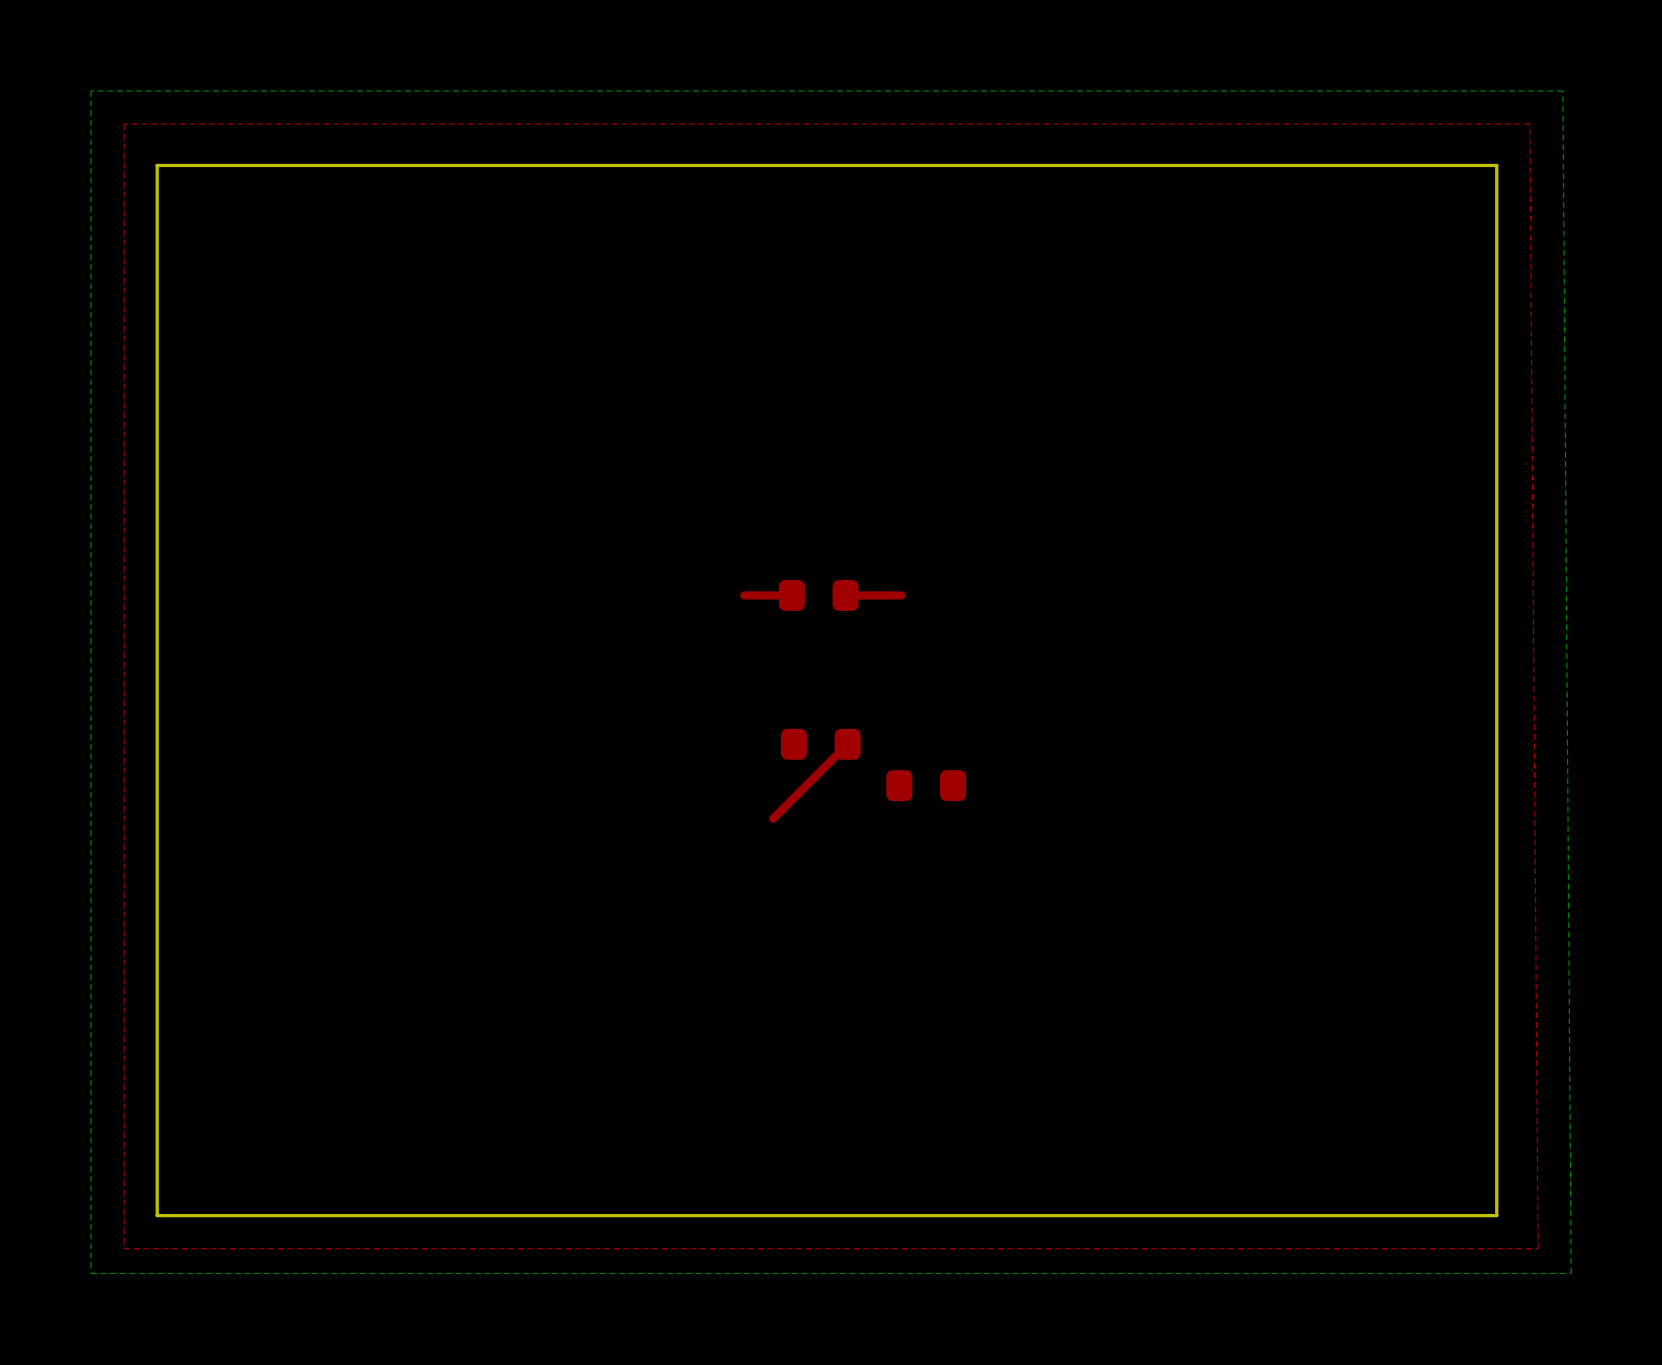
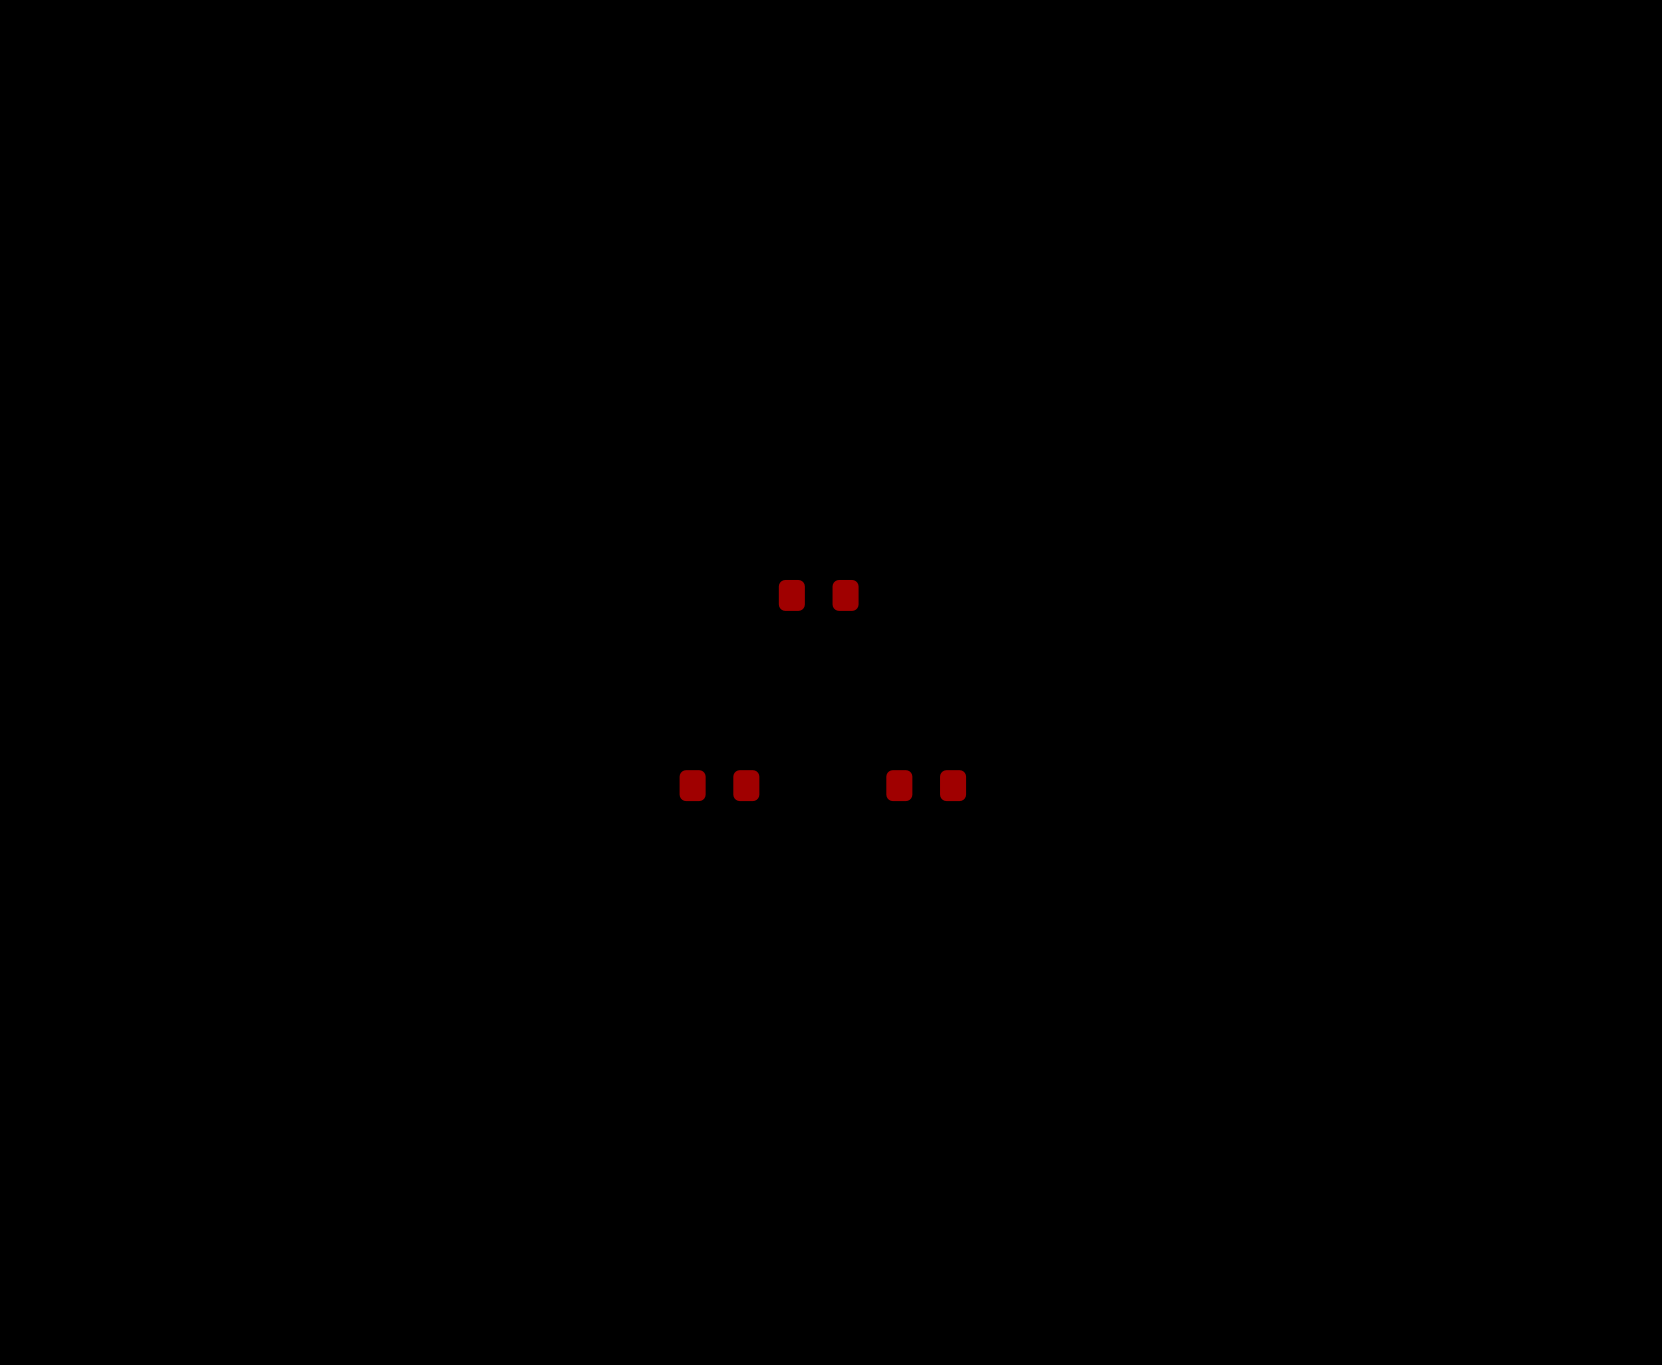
bottom zone outline: (1562, 91) (91, 91) (91, 1273) (1571, 1273) (1562, 91) -> none
top zone outline: (1529, 124) (124, 124) (124, 1248) (1538, 1248) (1529, 124) -> none
board edge: (1496, 165) (157, 165) (157, 1215) (1496, 1215) (1496, 165) -> none
top track: (791, 595) (744, 595) -> none
top track: (901, 595) (845, 595) -> none
part position: (820, 744) -> (719, 785)
top track: (847, 744) (773, 818) -> none

